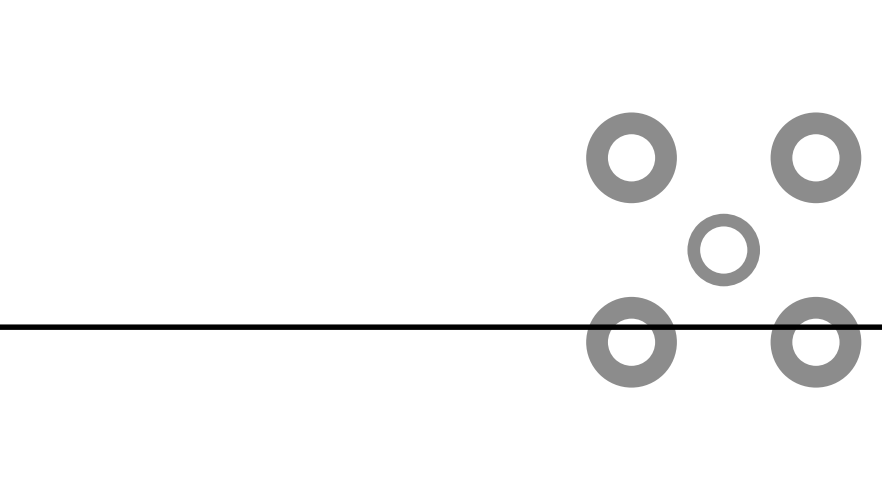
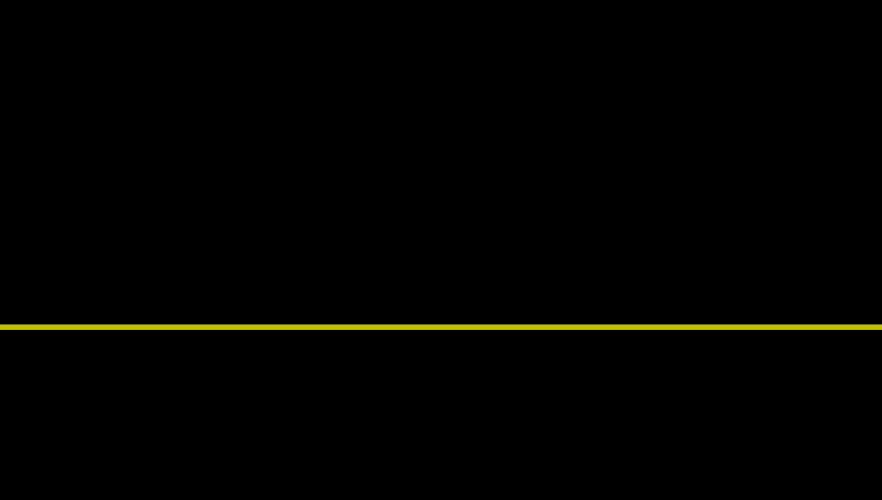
part: (723, 250) -> none

